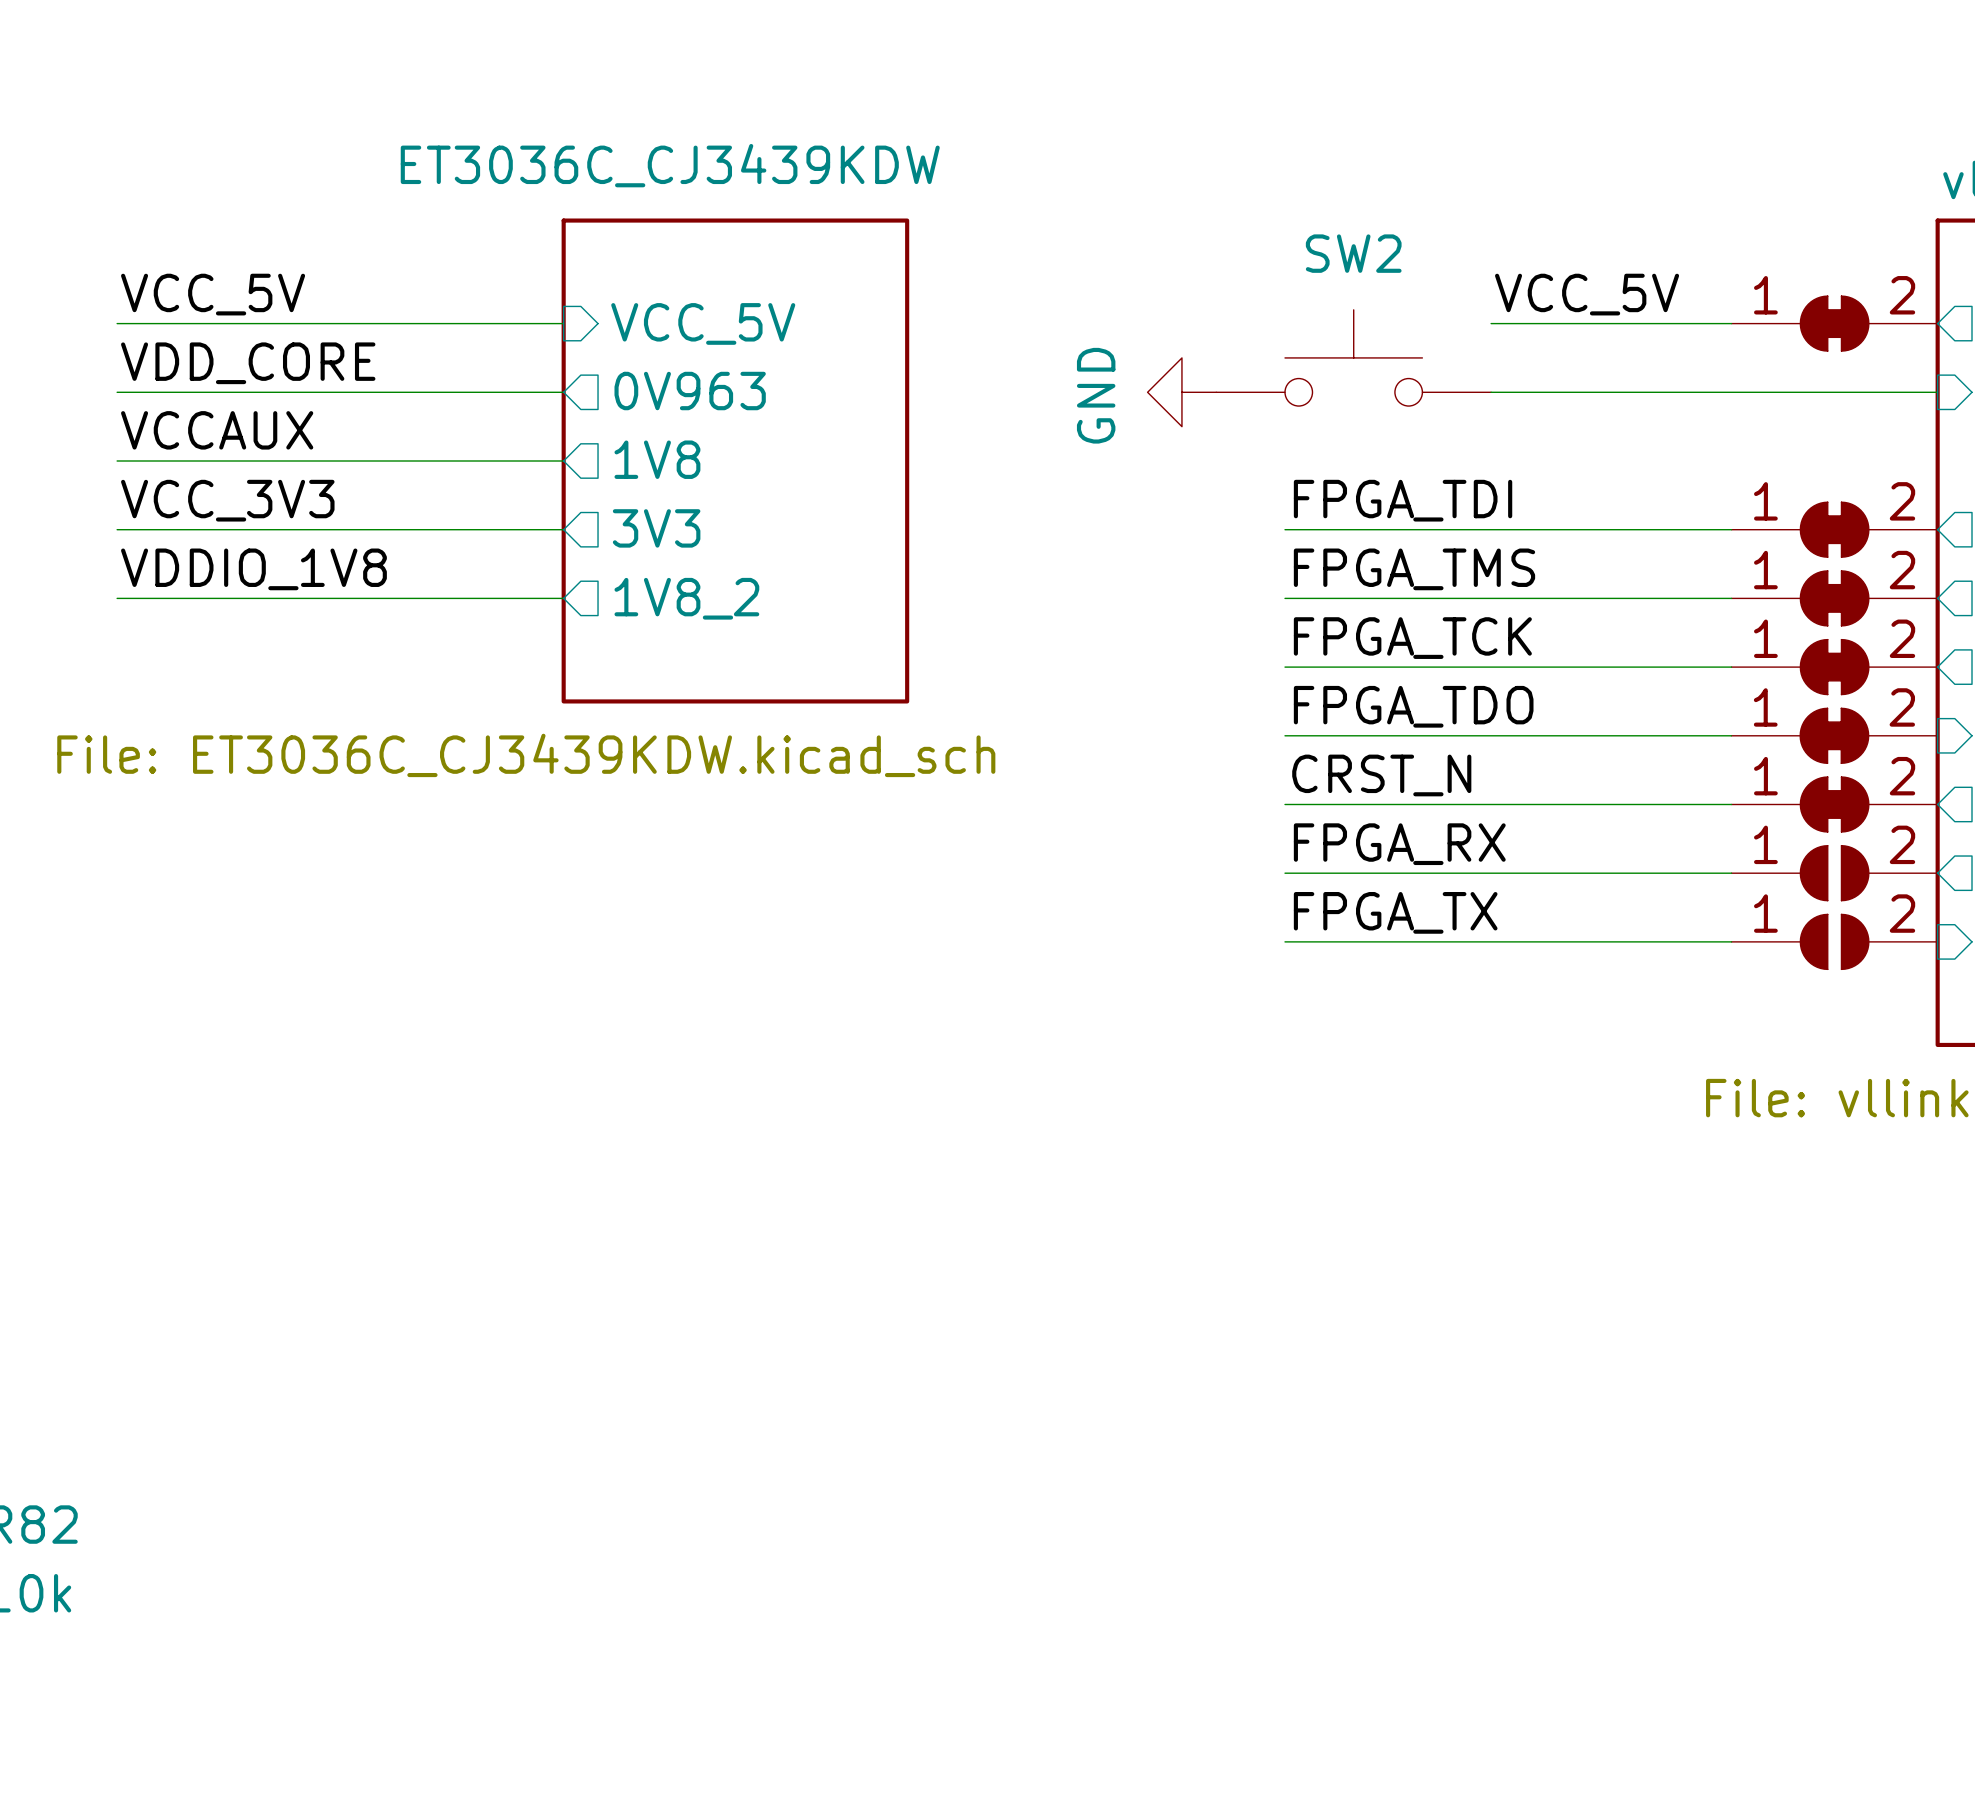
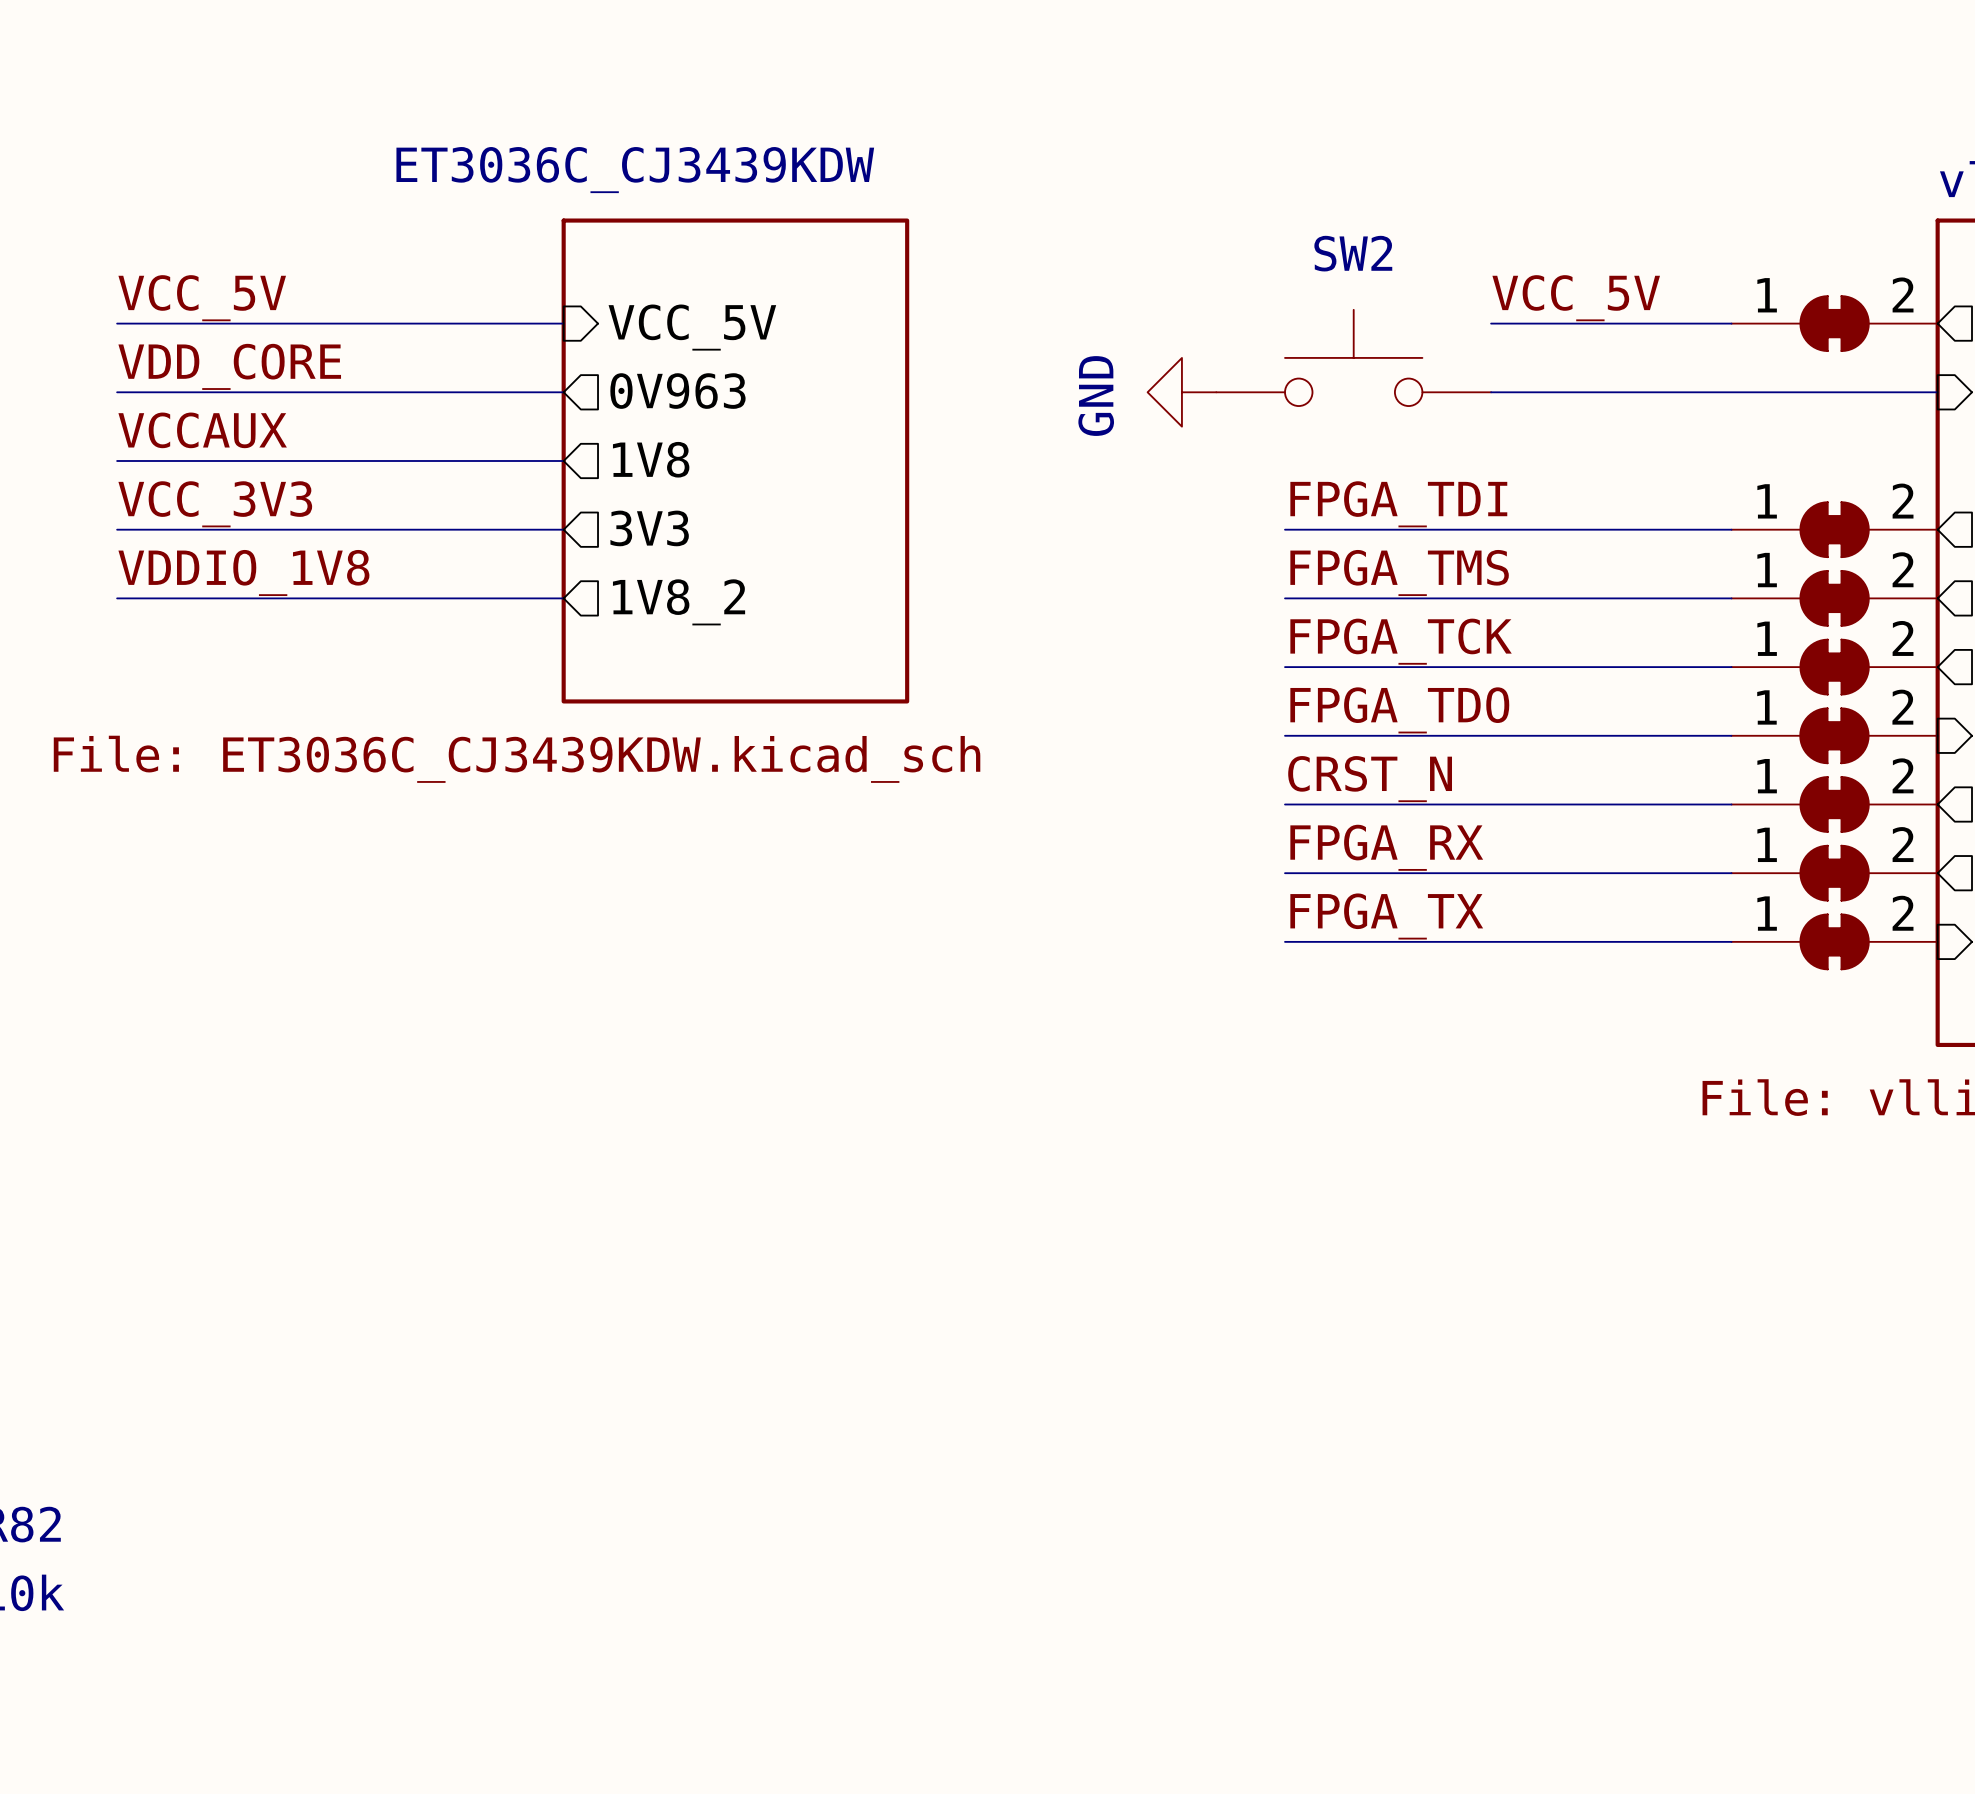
part symbol: [1731, 845, 1938, 901] -> [1731, 845, 1938, 901]
part symbol: [1731, 914, 1938, 970] -> [1731, 914, 1938, 970]

